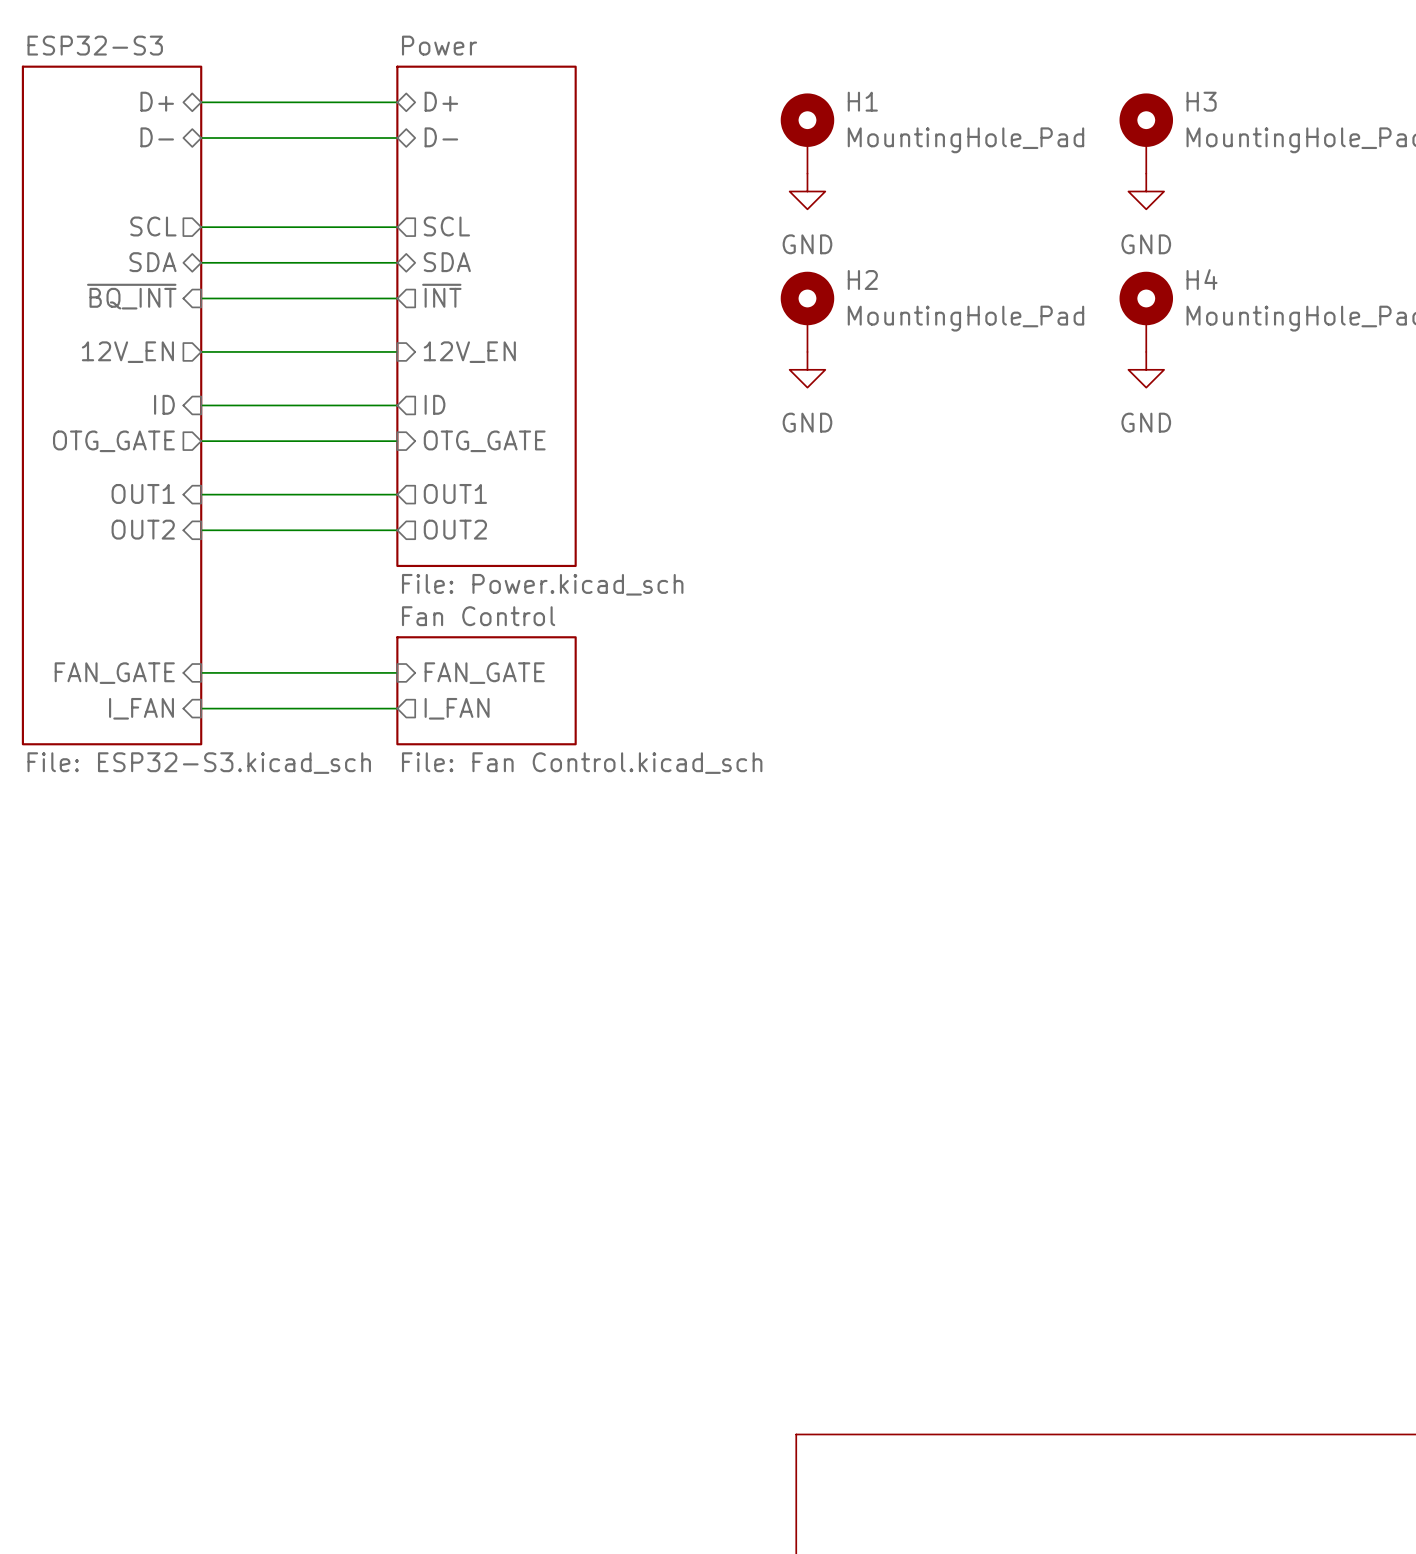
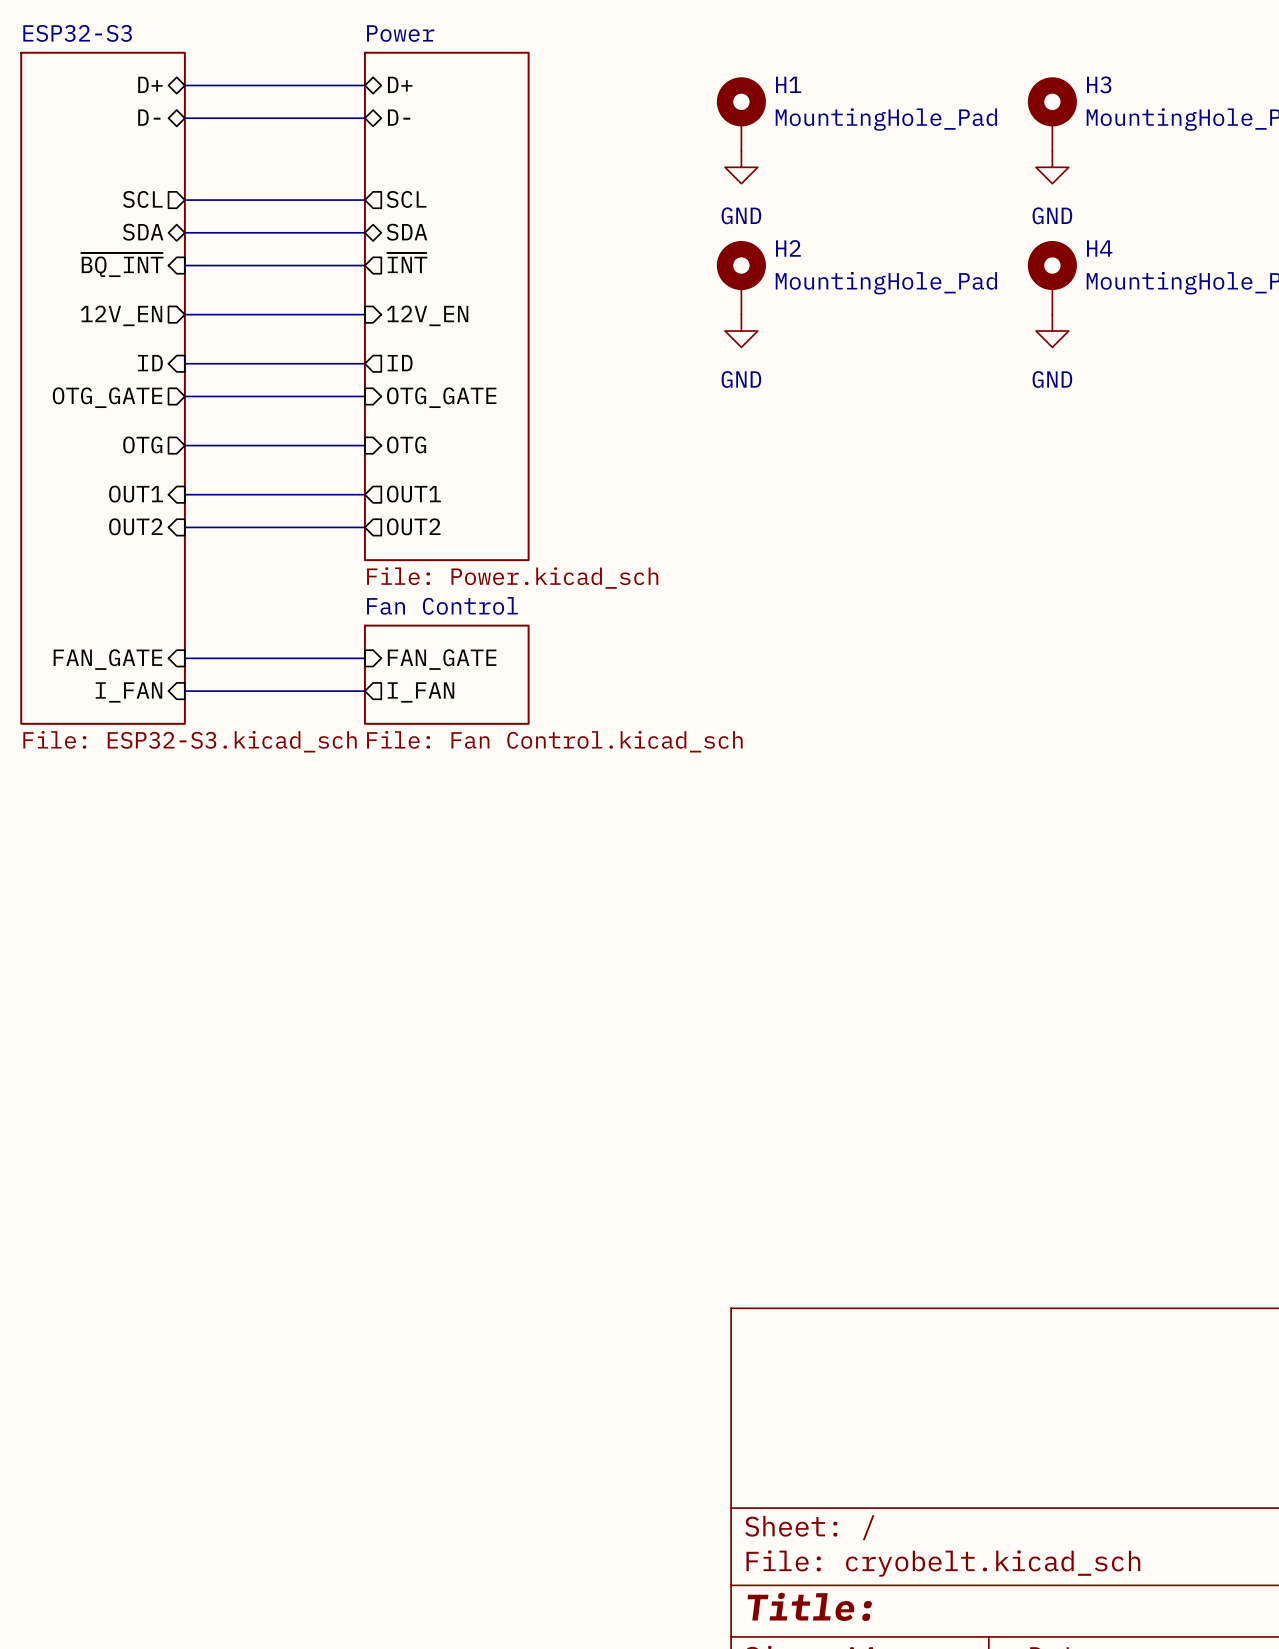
sheet ESP32-S3 shape: [21, 65, 203, 746] -> [20, 51, 186, 725]
sheet Power: File: Power.kicad_sch (486, 316) -> none
sheet Power: none -> File: Power.kicad_sch (446, 306)
sheet pin shape: input (143, 493) -> output (142, 444)
sheet pin: OUT1 (143, 493) -> OTG (142, 444)
sheet pin shape: output (455, 493) -> input (406, 444)
sheet pin: OUT1 (455, 493) -> OTG (406, 444)
sheet pin position: OUT2 (143, 529) -> OUT2 (135, 526)
sheet pin position: OUT2 (455, 529) -> OUT2 (413, 526)
wire: (201, 530) (397, 530) -> (184, 527) (364, 527)
sheet pin: none -> OUT1 (136, 494)
sheet pin: none -> OUT1 (413, 494)
wire: none -> (184, 494) (364, 494)
wire: (201, 672) (397, 672) -> (184, 658) (364, 658)
sheet pin position: FAN_GATE (114, 673) -> FAN_GATE (107, 659)
sheet pin position: FAN_GATE (484, 673) -> FAN_GATE (442, 659)
sheet Fan Control position: (486, 690) -> (446, 674)
sheet pin position: I_FAN (141, 708) -> I_FAN (128, 692)
wire: (201, 708) (397, 708) -> (184, 691) (364, 691)
sheet pin position: I_FAN (457, 708) -> I_FAN (420, 692)

